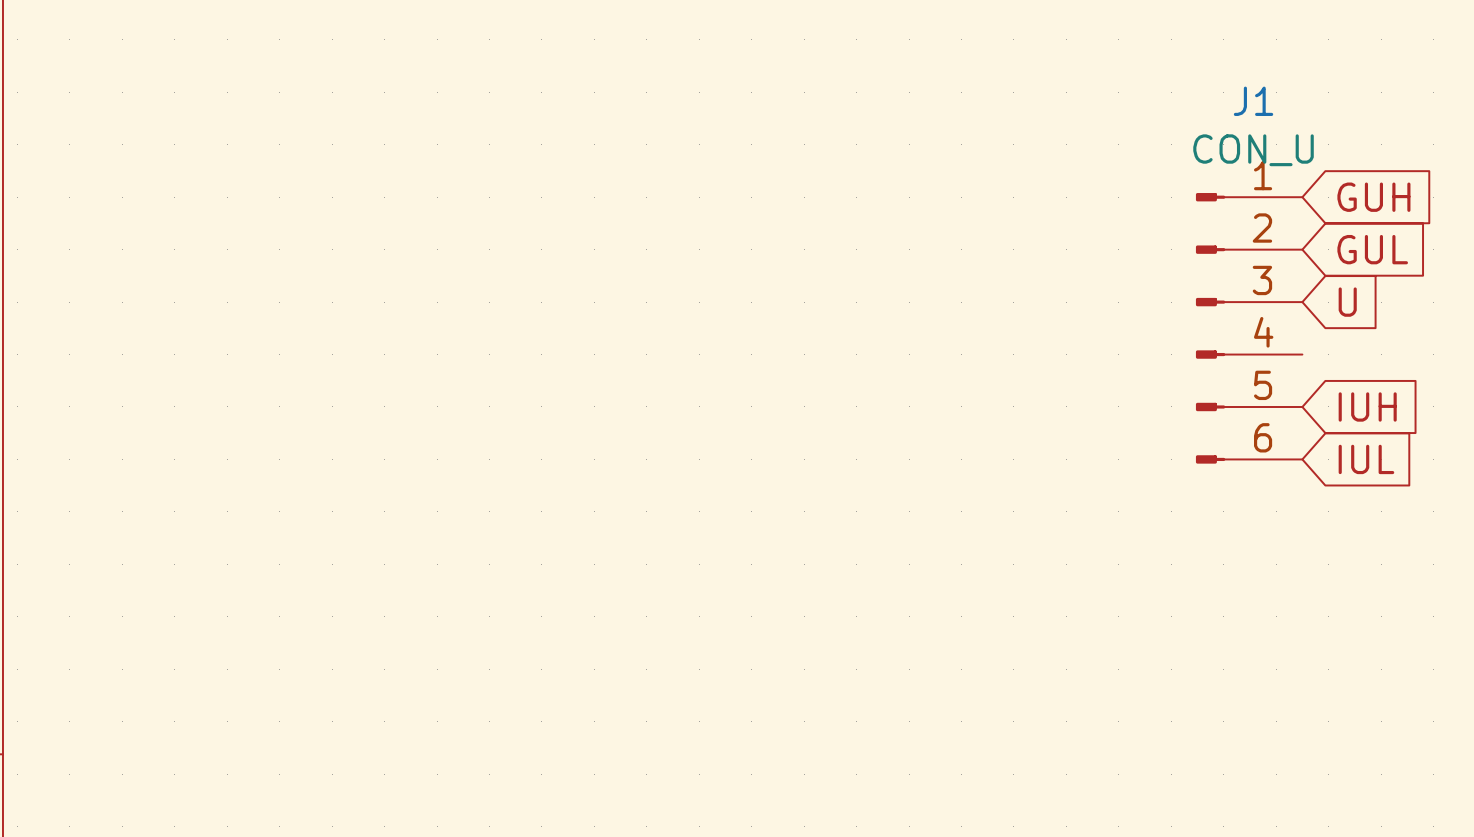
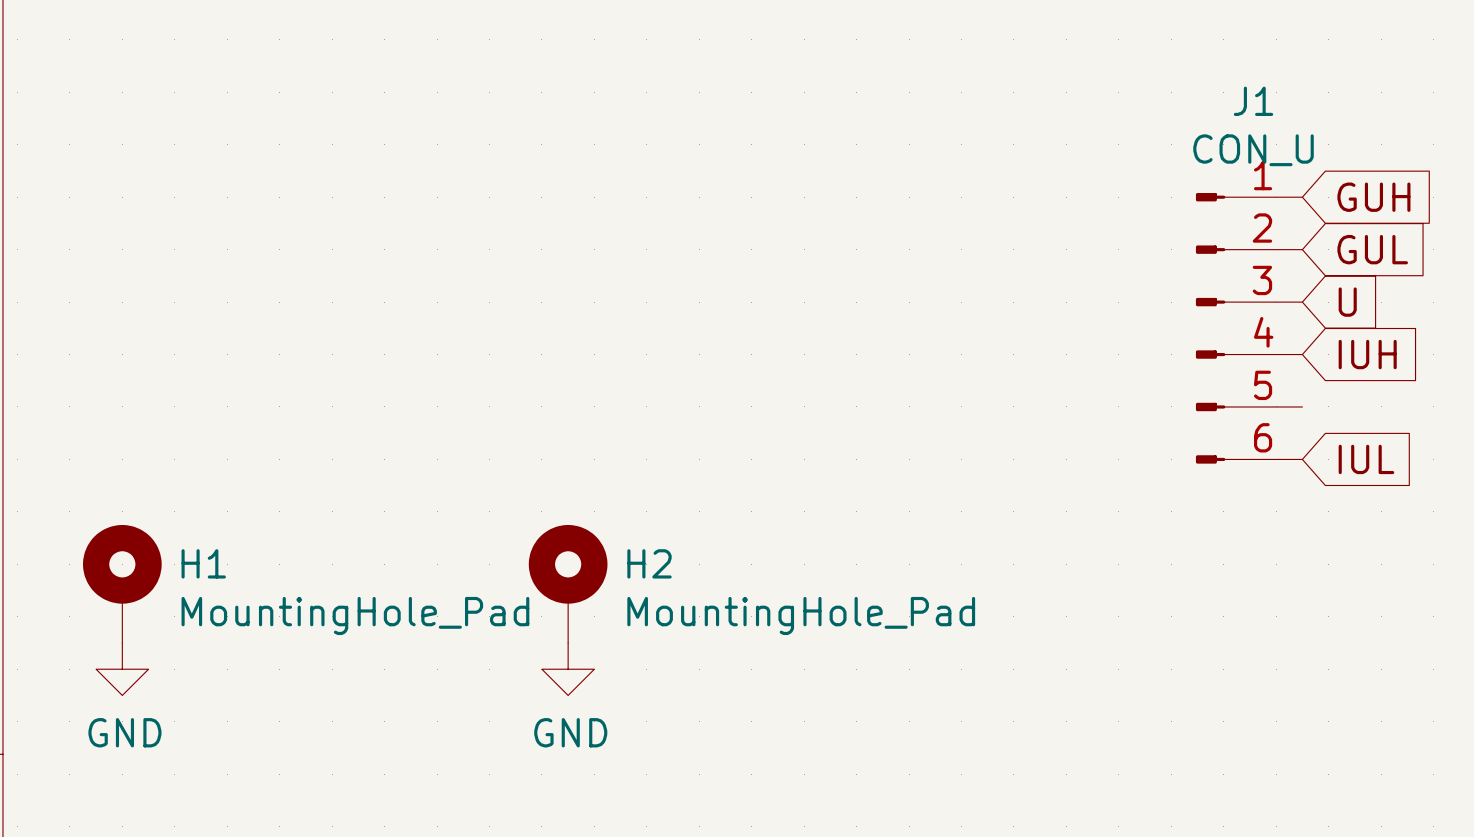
global label position: IUH (1367, 406) -> IUH (1367, 354)
H1: none -> MountingHole_Pad (122, 584)
H2: none -> MountingHole_Pad (568, 584)
power symbol: none -> GND (122, 669)
power symbol: none -> GND (568, 669)

